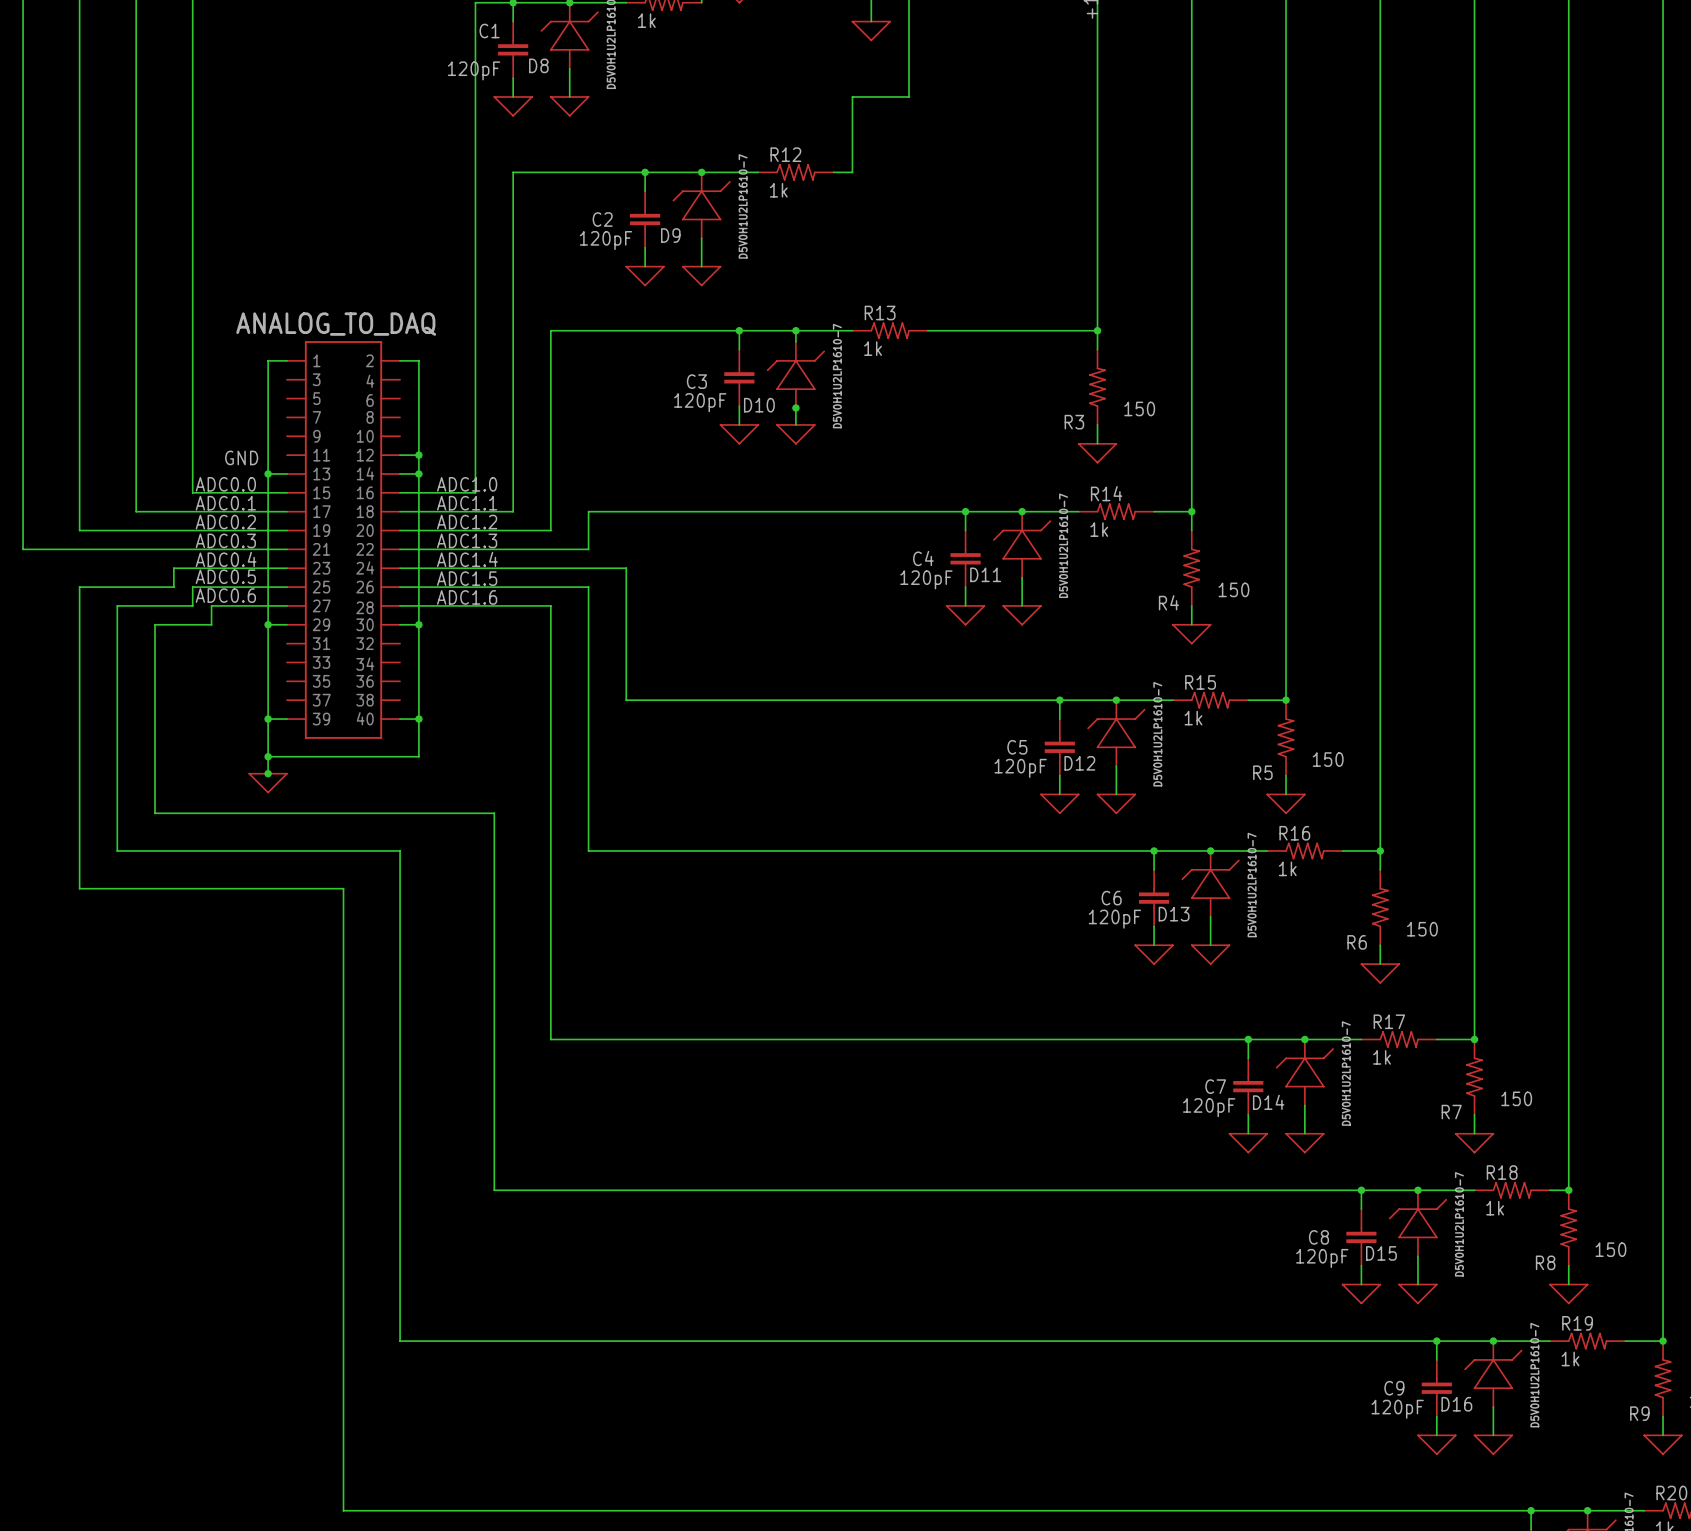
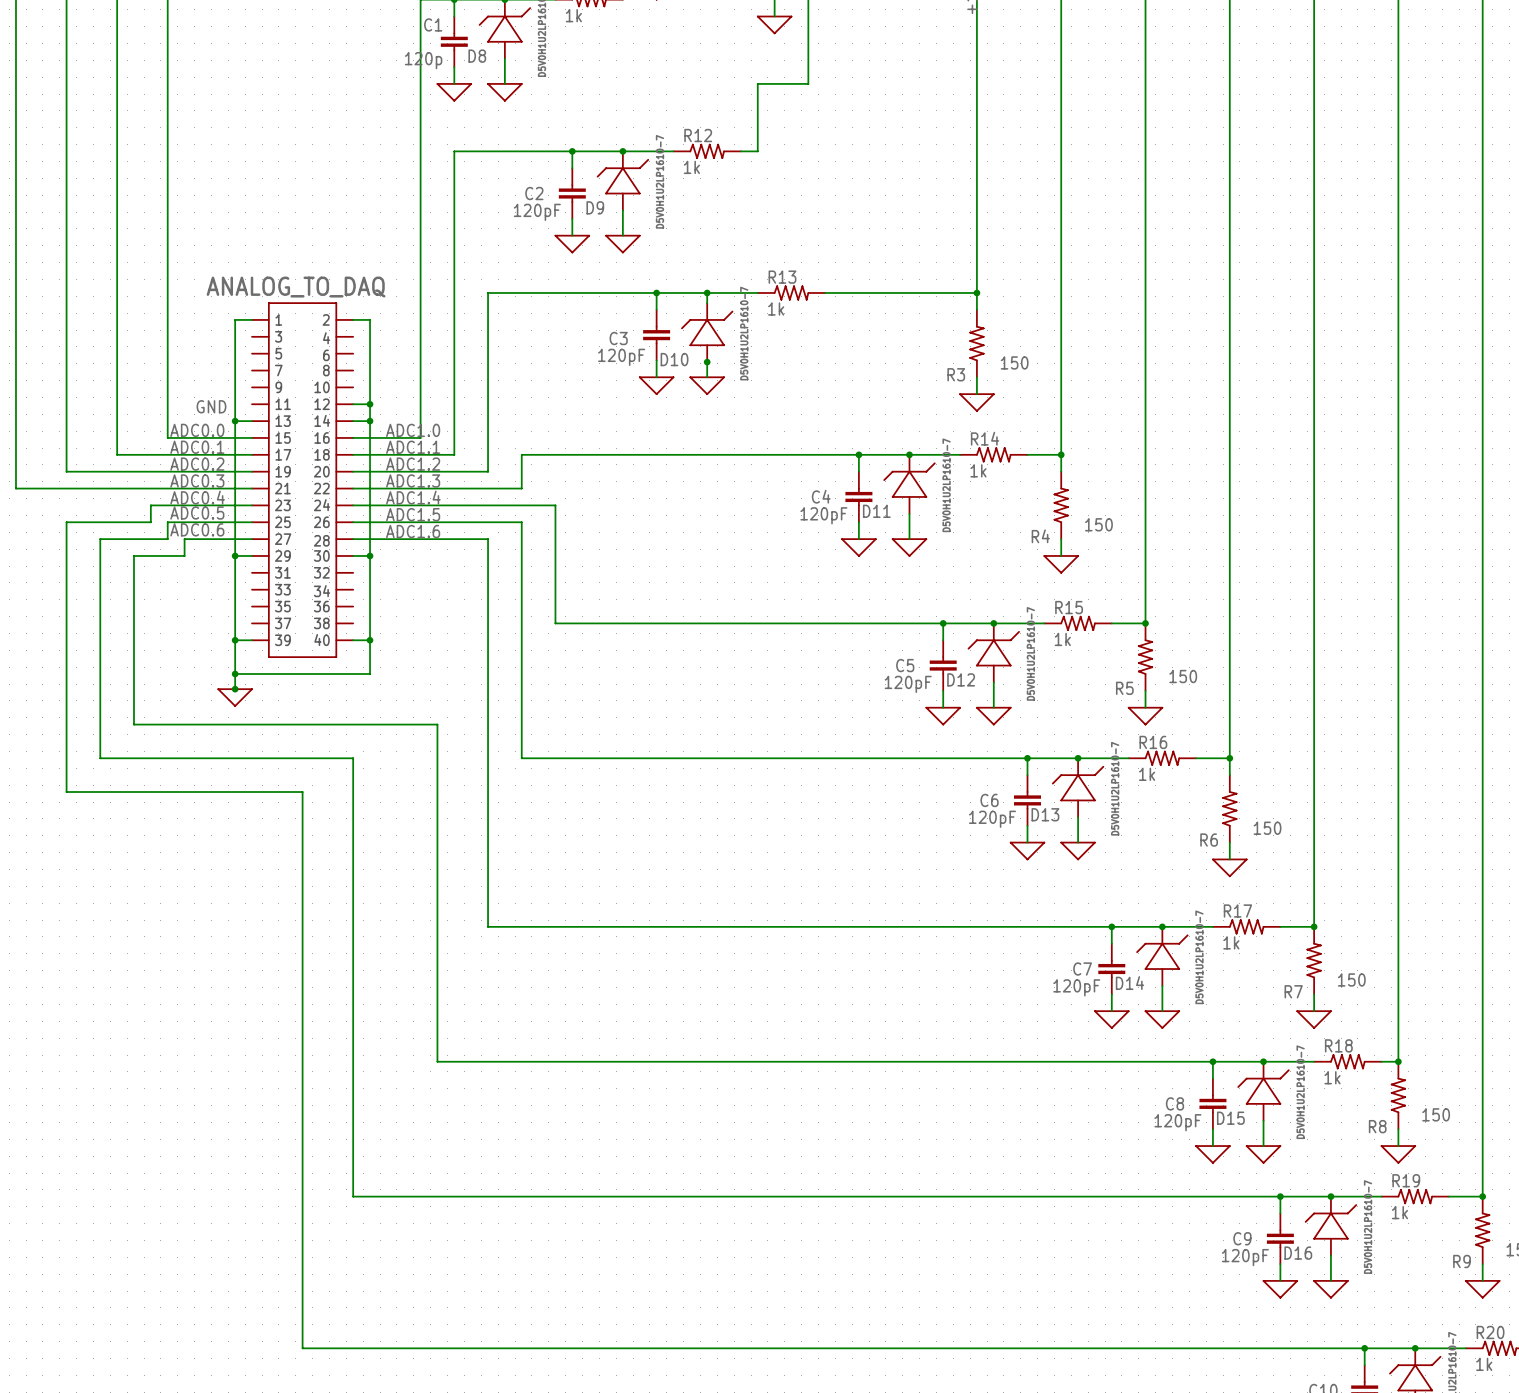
C1 value: 120pF (474, 70) -> 120p (423, 60)

